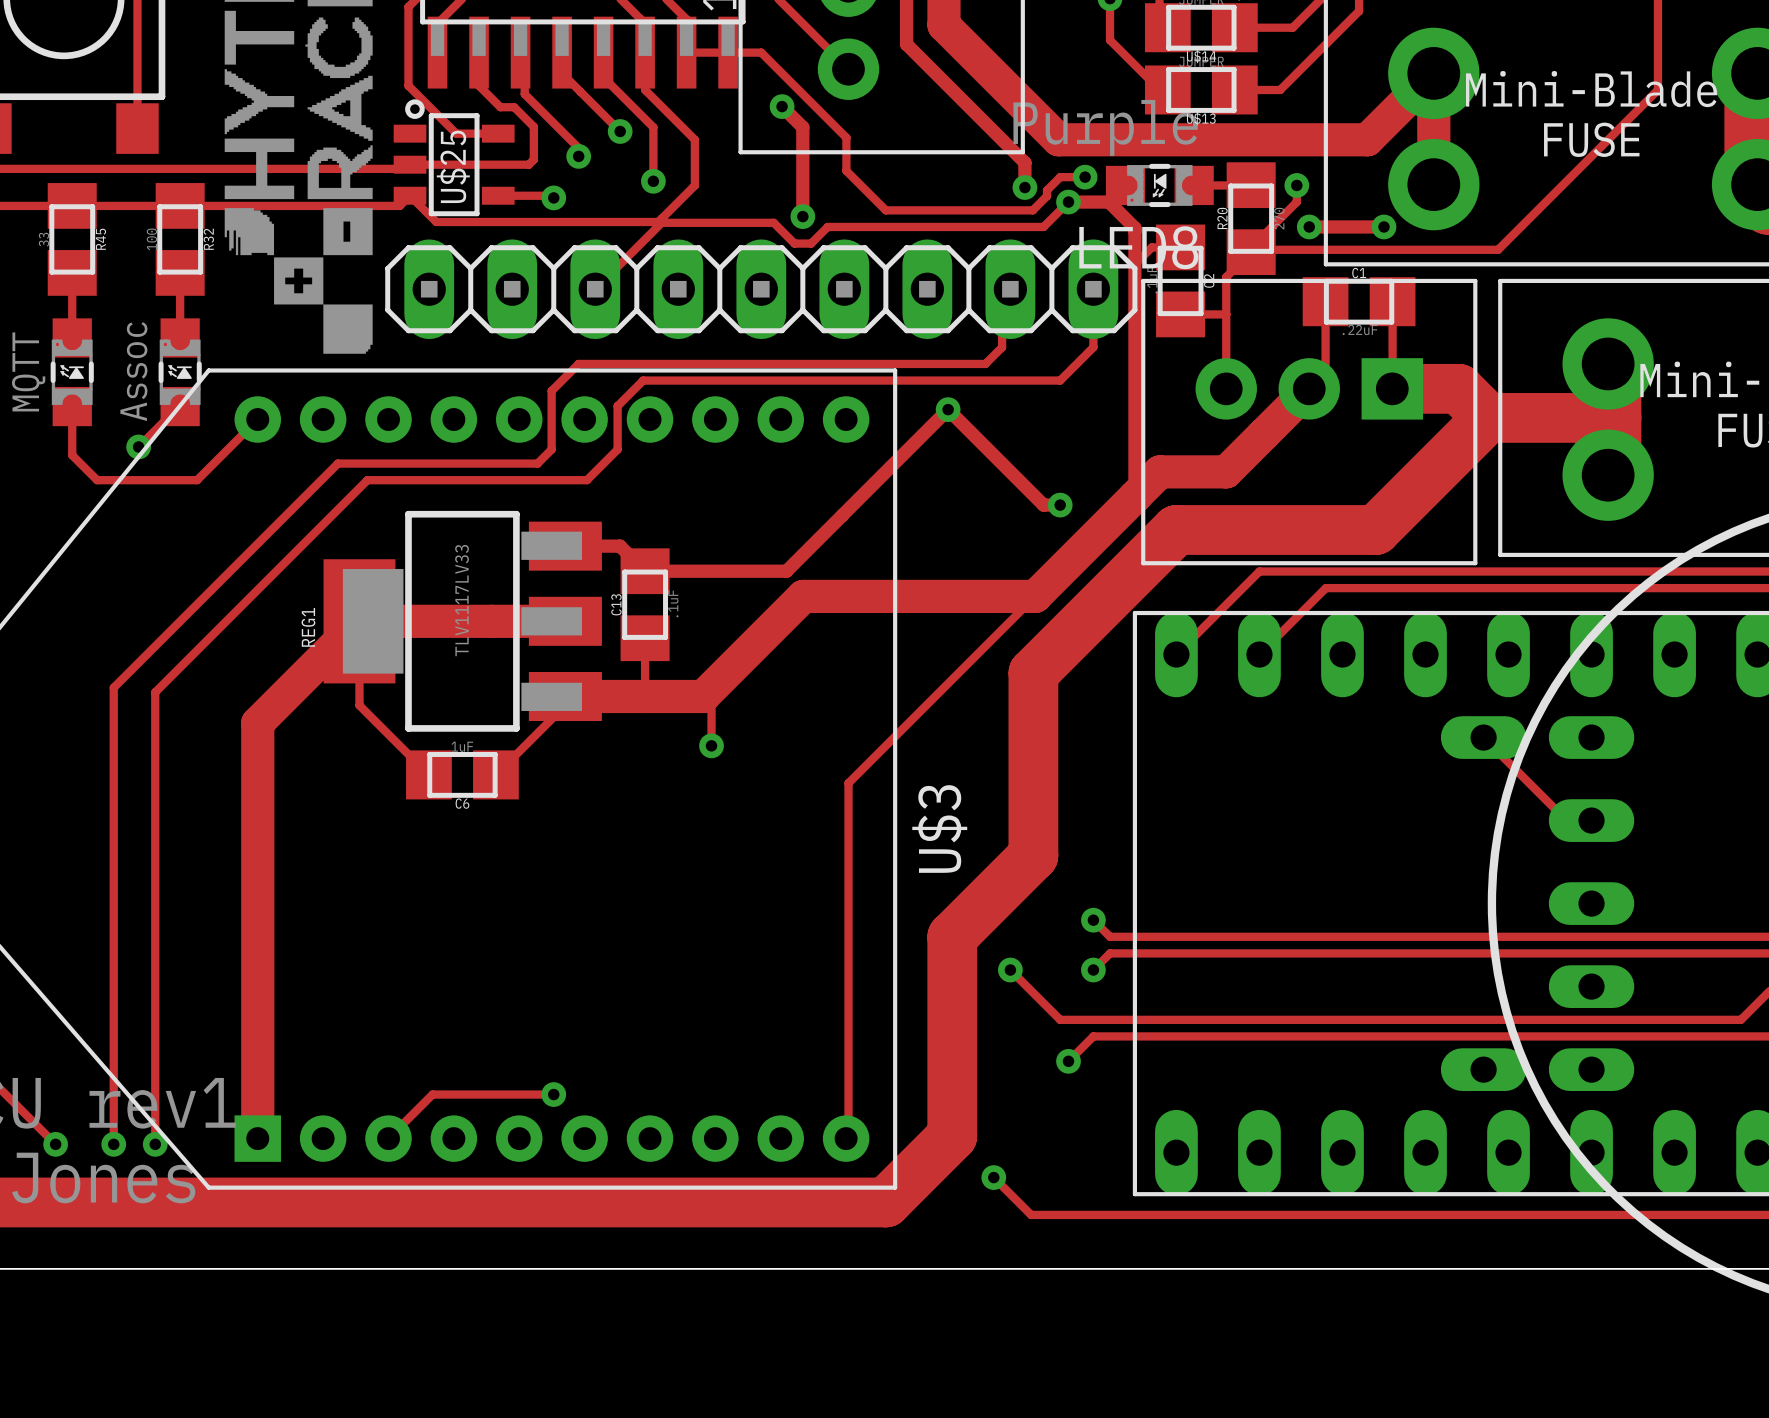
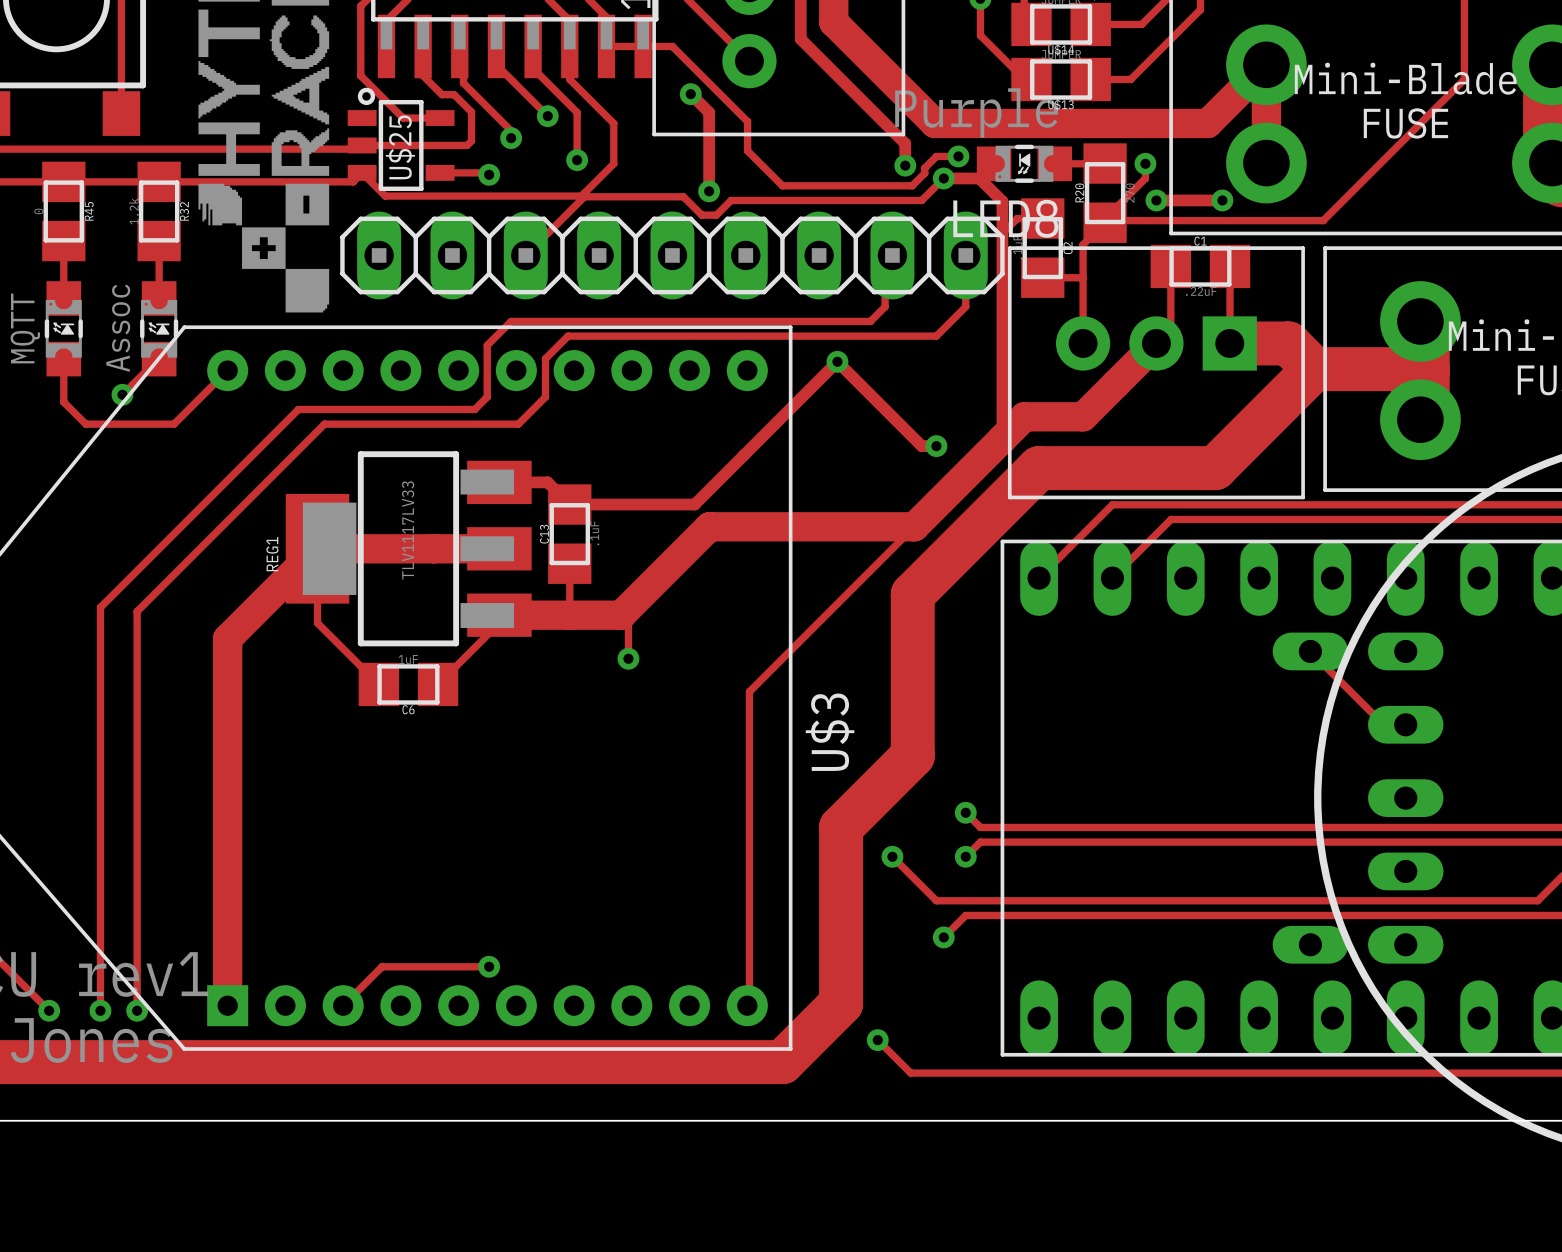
R45 value: 33 (44, 239) -> 0 (38, 211)
R32 value: 100 (151, 239) -> 1.2k (133, 211)

